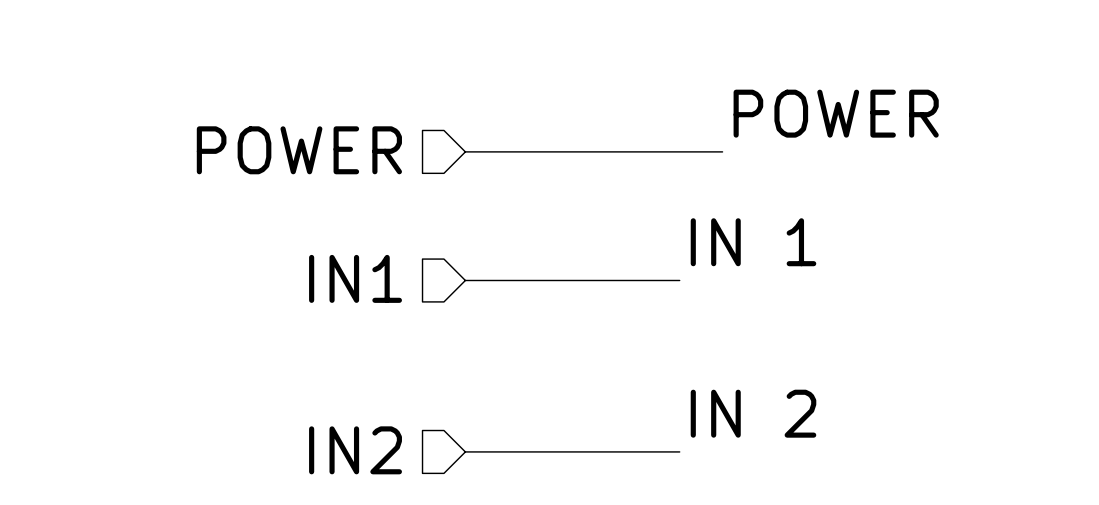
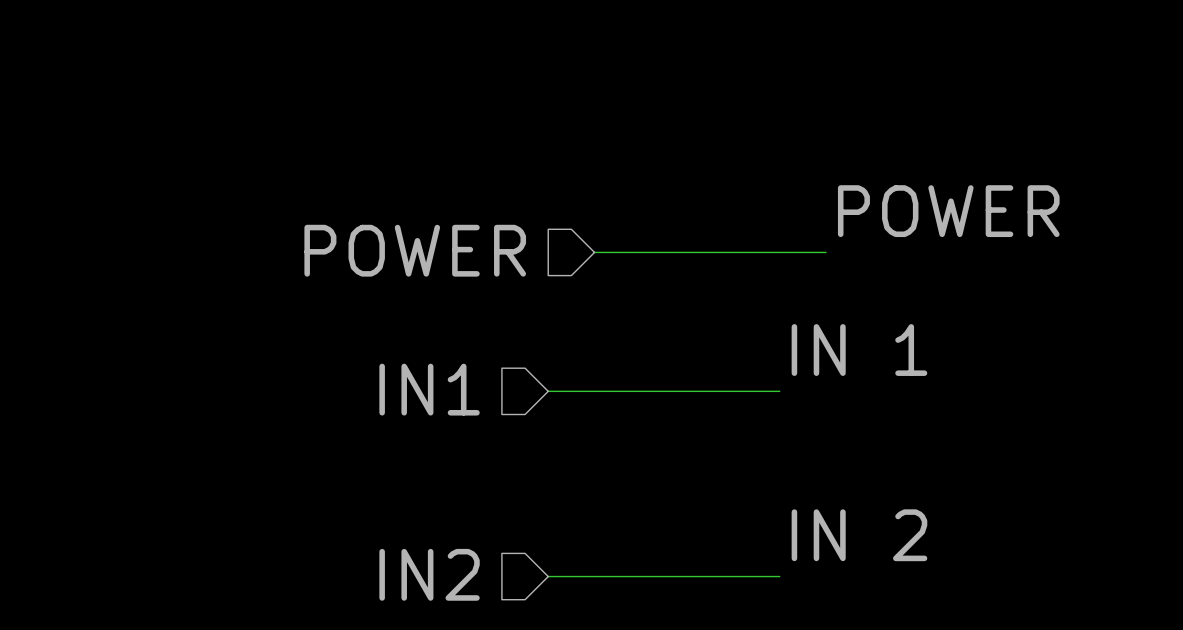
hierarchical label position: POWER (299, 150) -> POWER (415, 250)
wire: (465, 151) (508, 151) -> none

